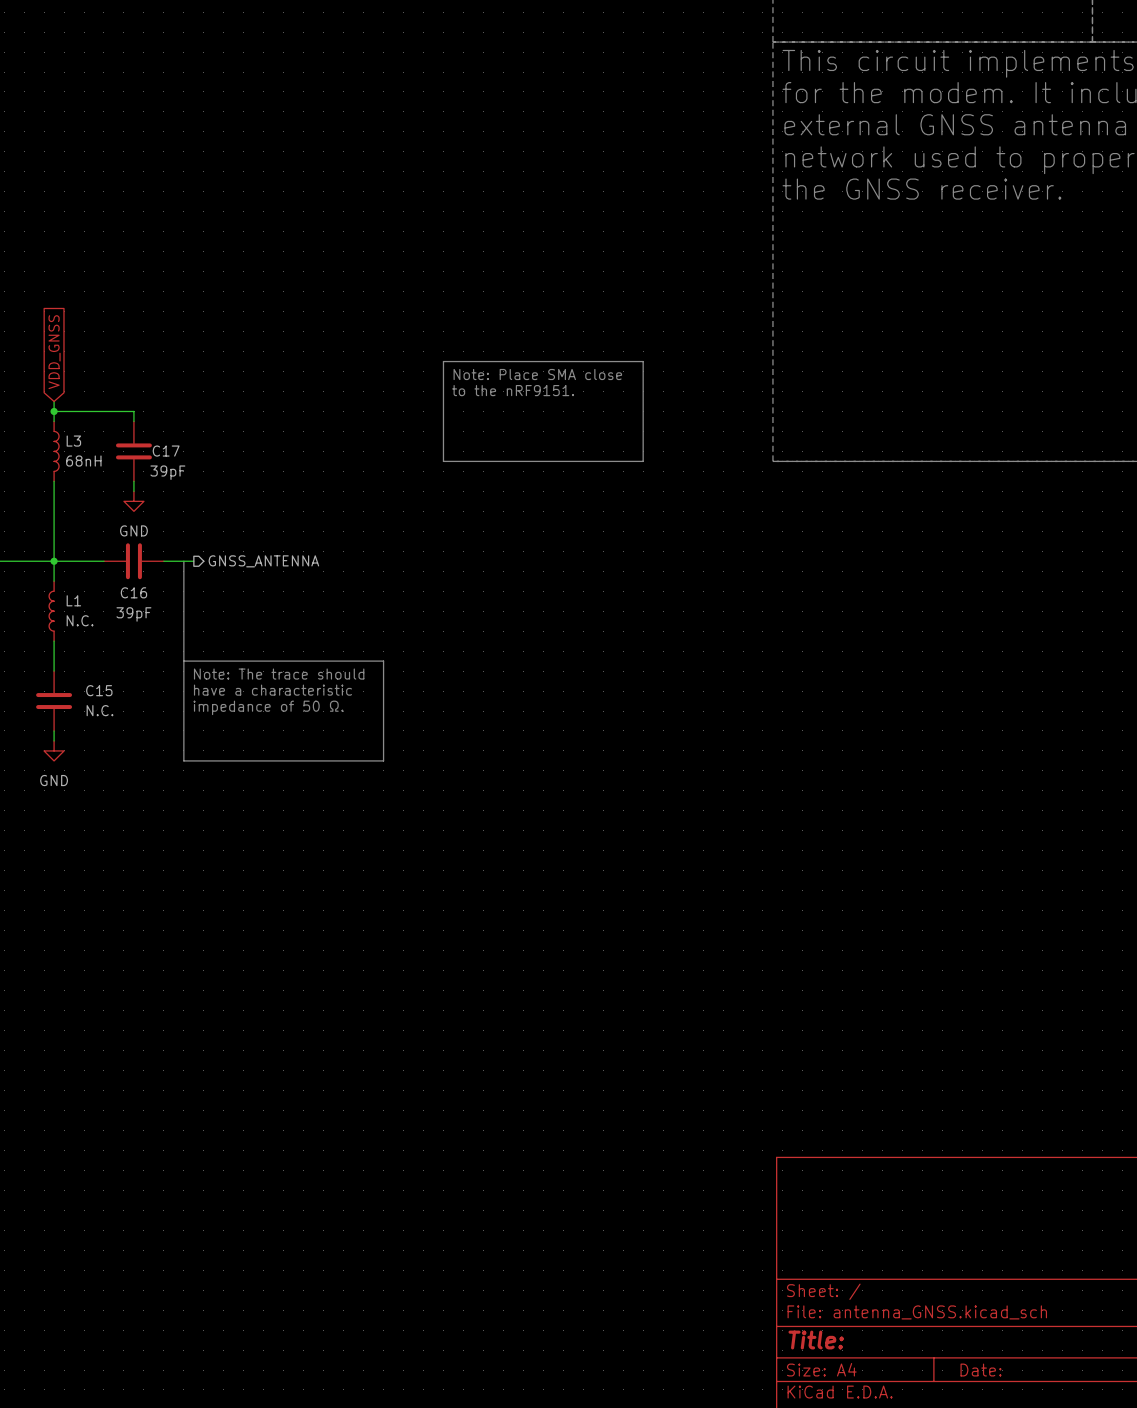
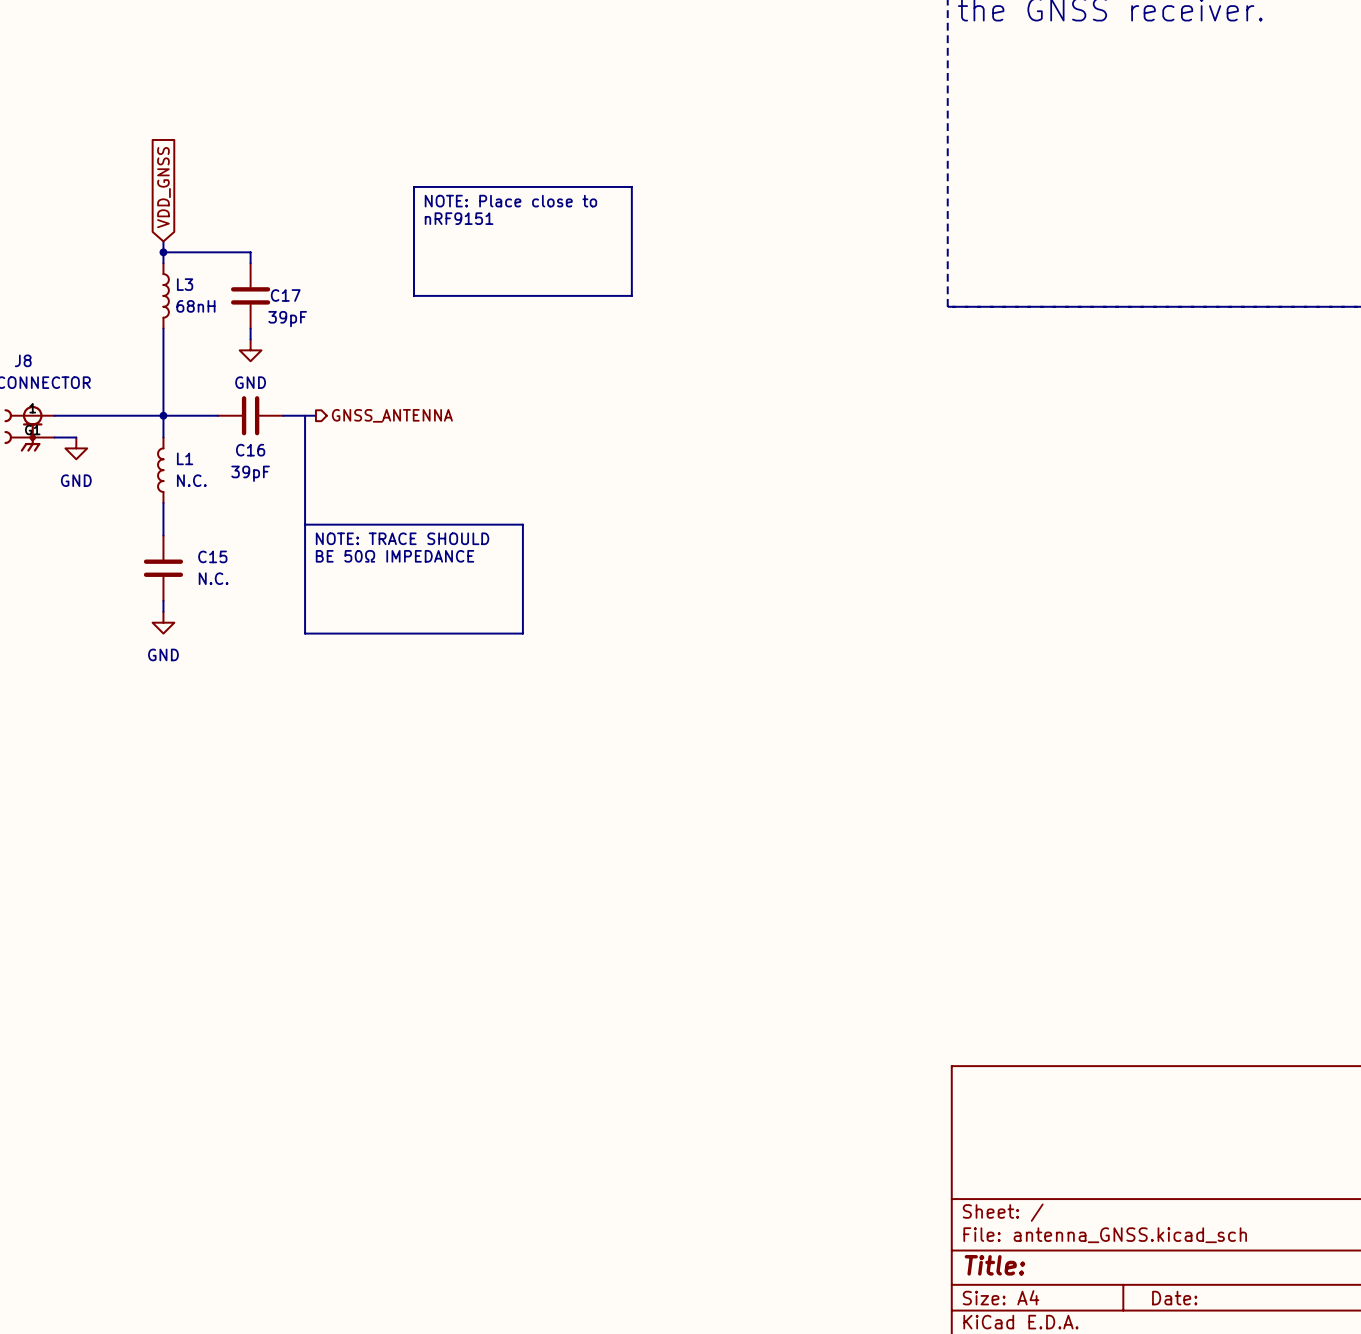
line: (443, 361) (643, 361) (643, 461) (443, 461) (443, 361) -> (413, 186) (631, 186) (631, 295) (413, 295) (413, 186)
text: Note: Place SMA close (537, 374) -> NOTE: Place close to (510, 201)
text: none -> nRF9151 (459, 218)
text: to the nRF9151. (513, 390) -> none
text: Note: The trace should (279, 674) -> NOTE: TRACE SHOULD (402, 538)
text: have a characteristic (272, 690) -> BE 50Ω IMPEDANCE (395, 556)
text: impedance of 50 Ω. (268, 707) -> none

